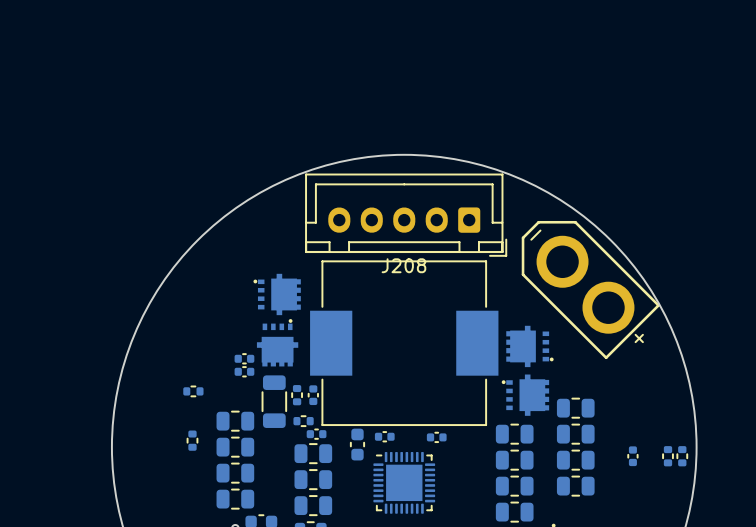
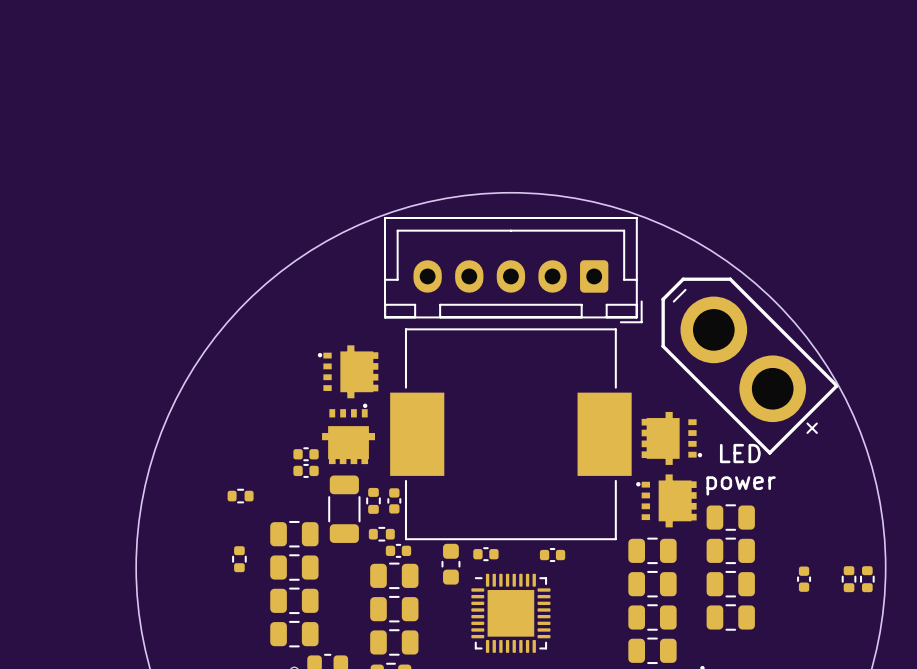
J208 name: J208 (403, 265) -> none
text: none -> LED (740, 453)
text: none -> power (741, 485)

